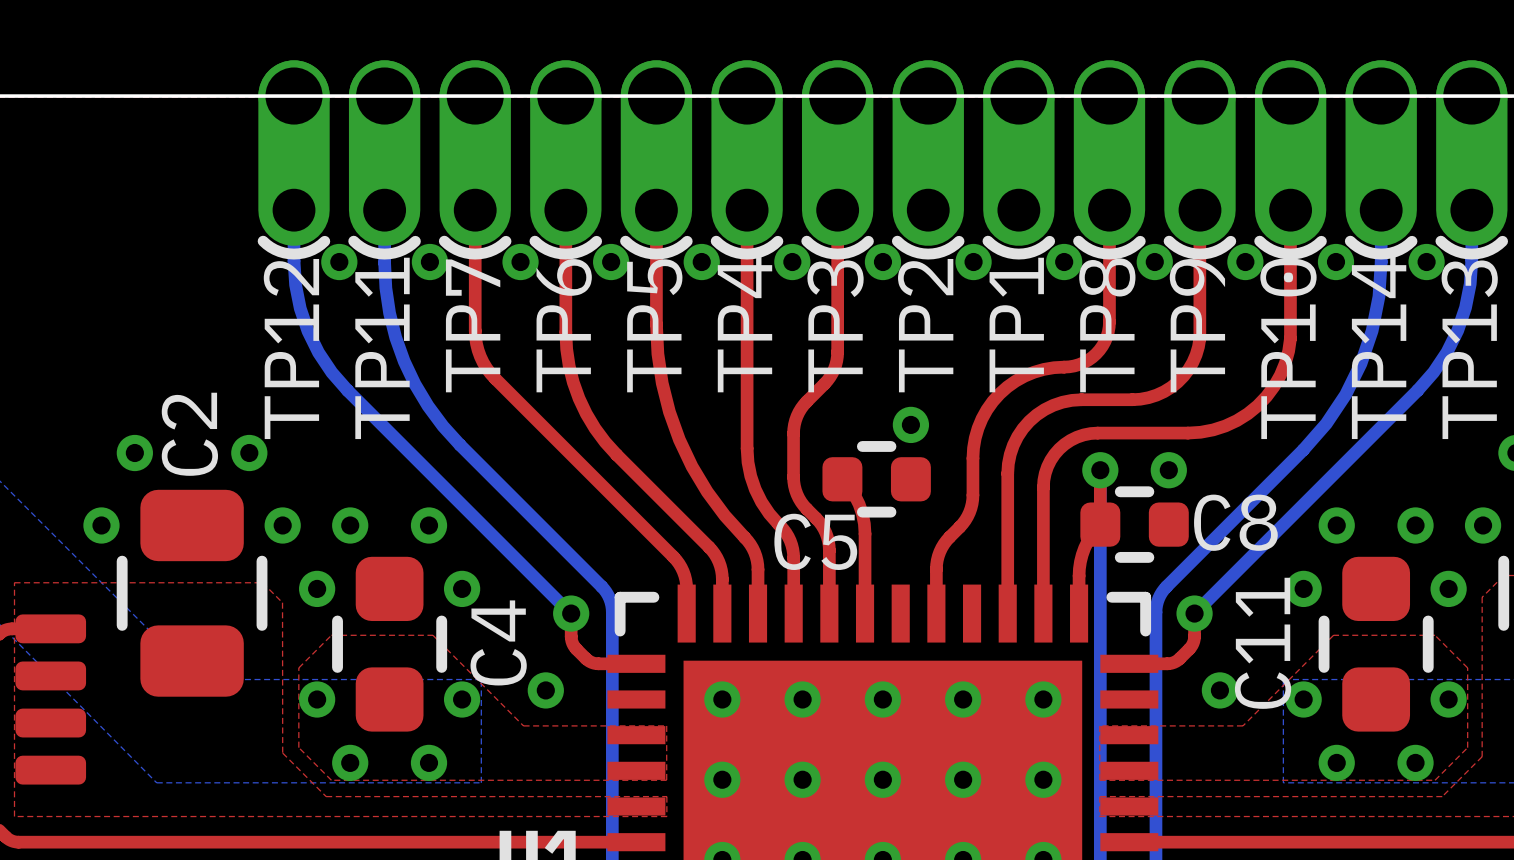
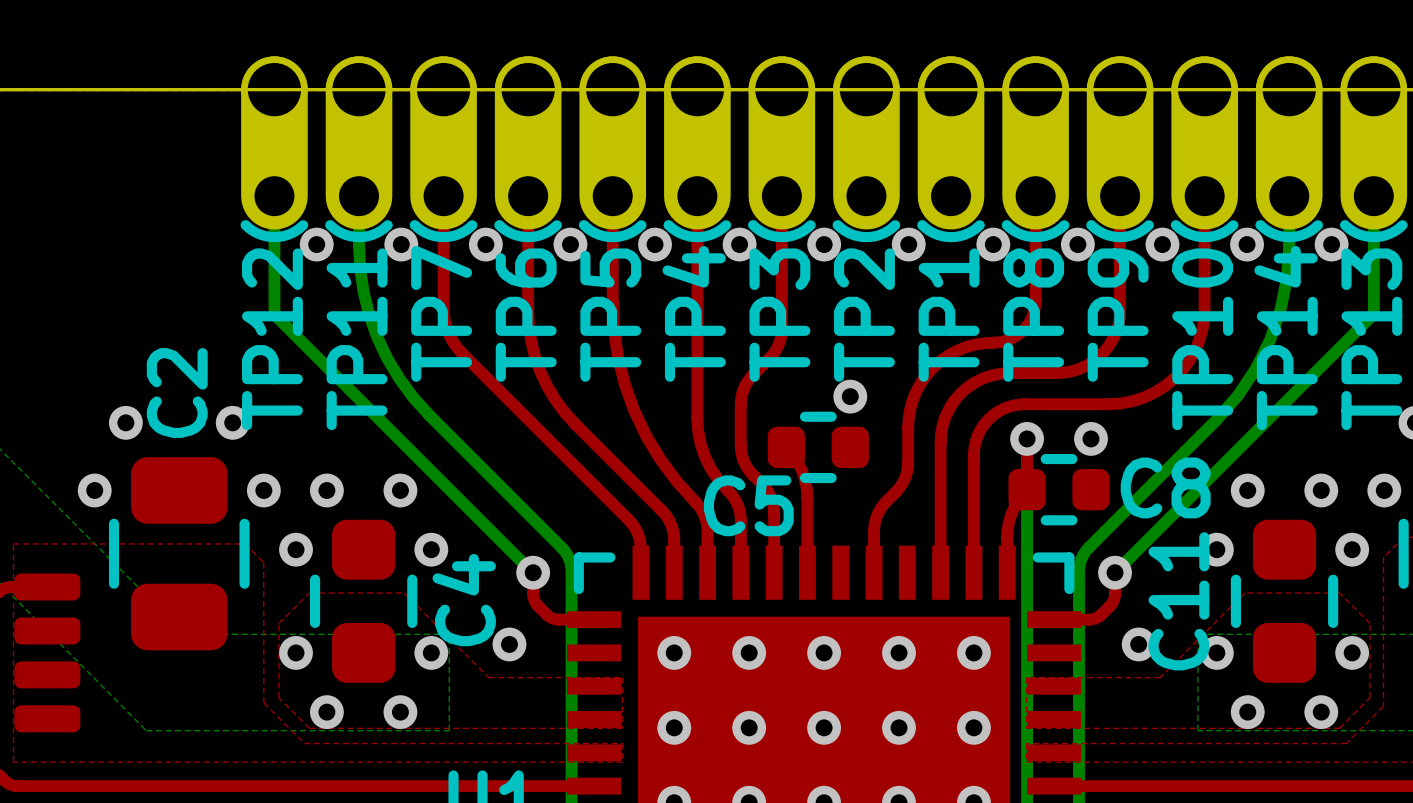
bottom track: (1471, 259) (1470, 283) (1465, 307) (1457, 330) (1447, 352) (1433, 372) (1417, 390) -> (1373, 242) (1373, 313) (1323, 364)
bottom track: (294, 261) (295, 284) (300, 308) (307, 331) (318, 352) (331, 372) (347, 390) -> (274, 243) (274, 314) (324, 364)

